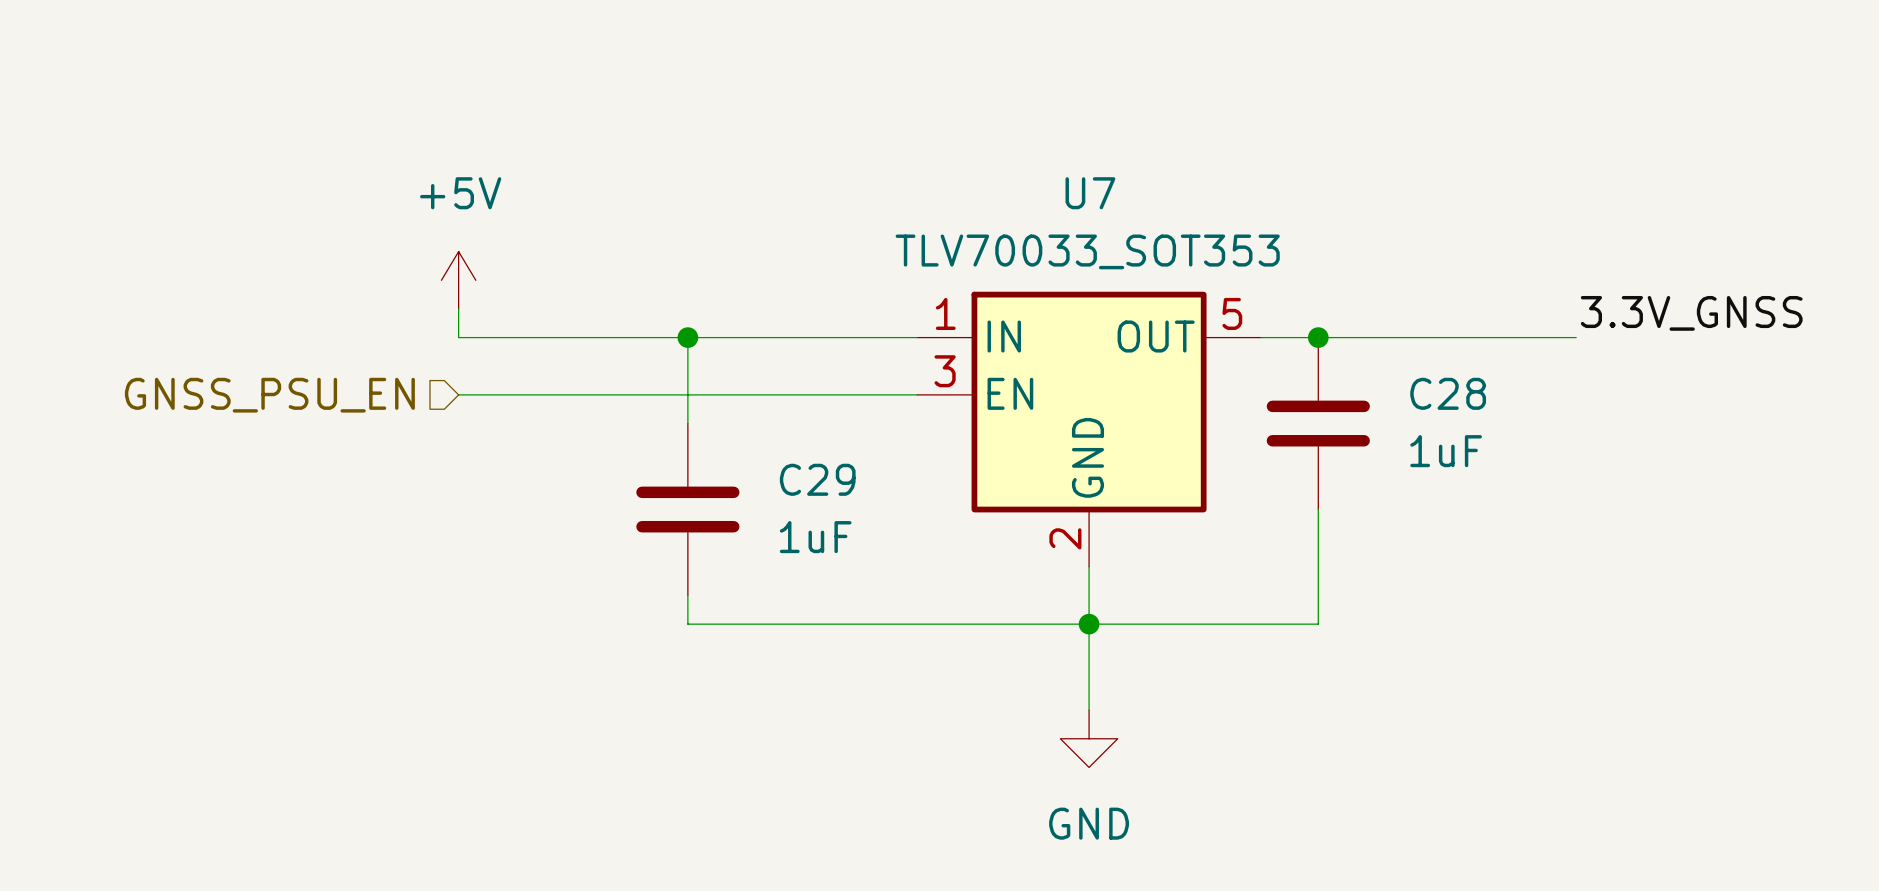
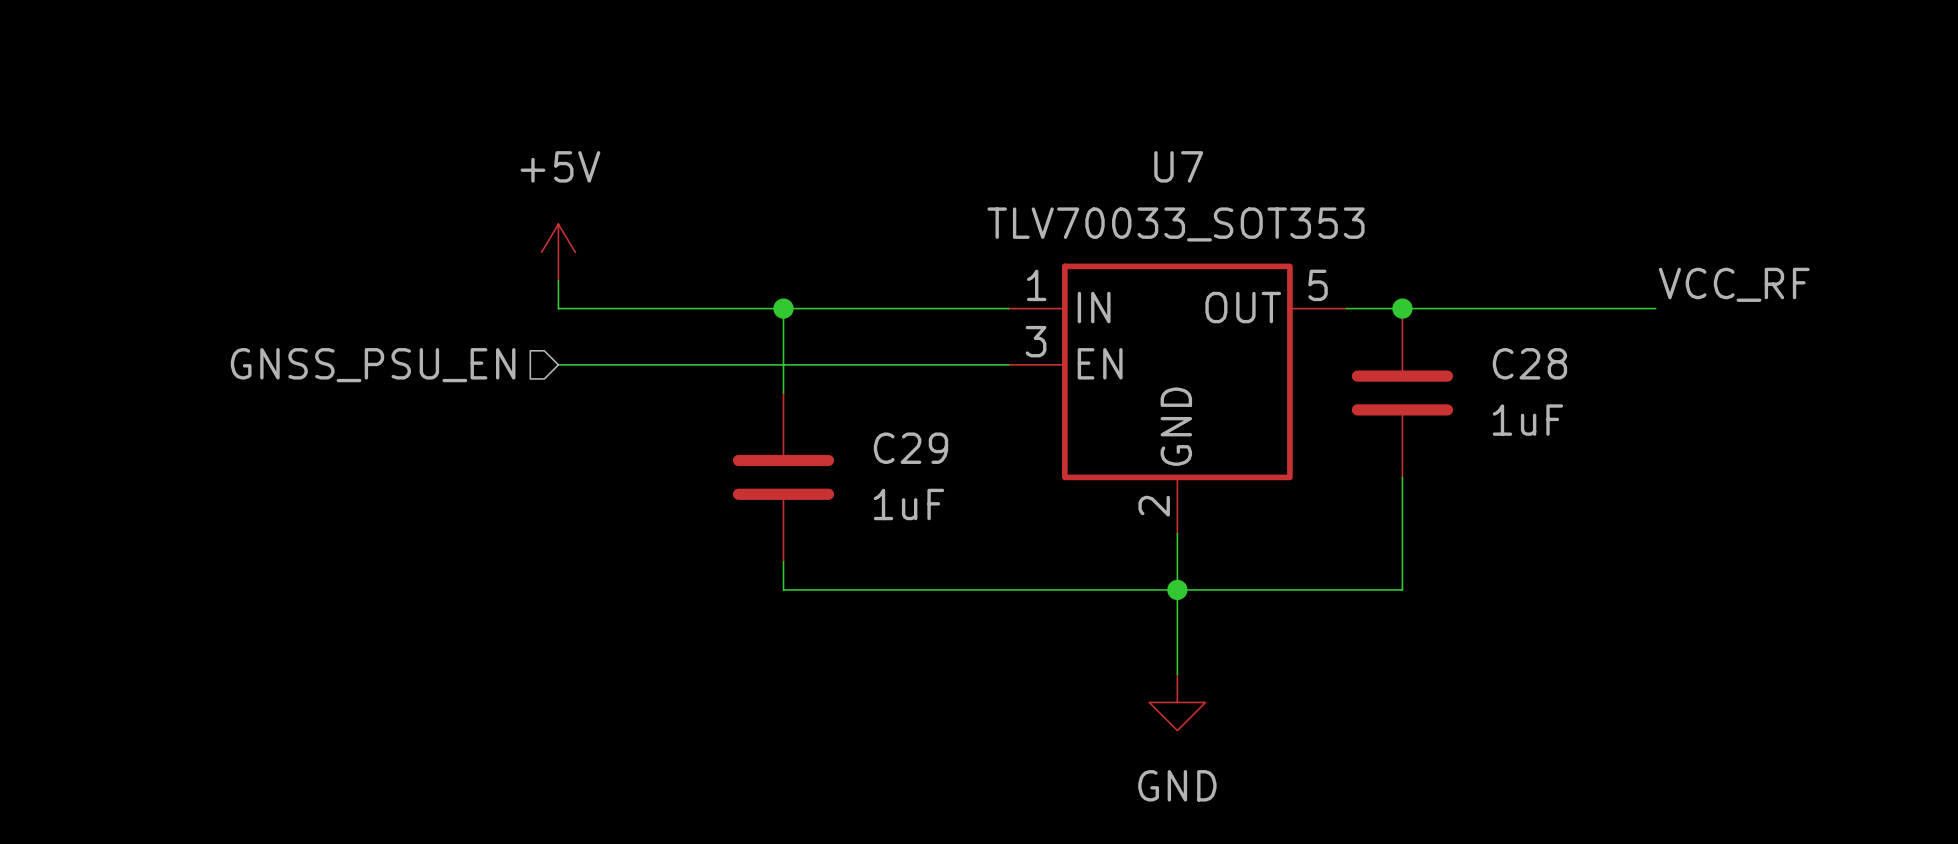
label: 3.3V_GNSS (1691, 313) -> VCC_RF (1734, 284)

